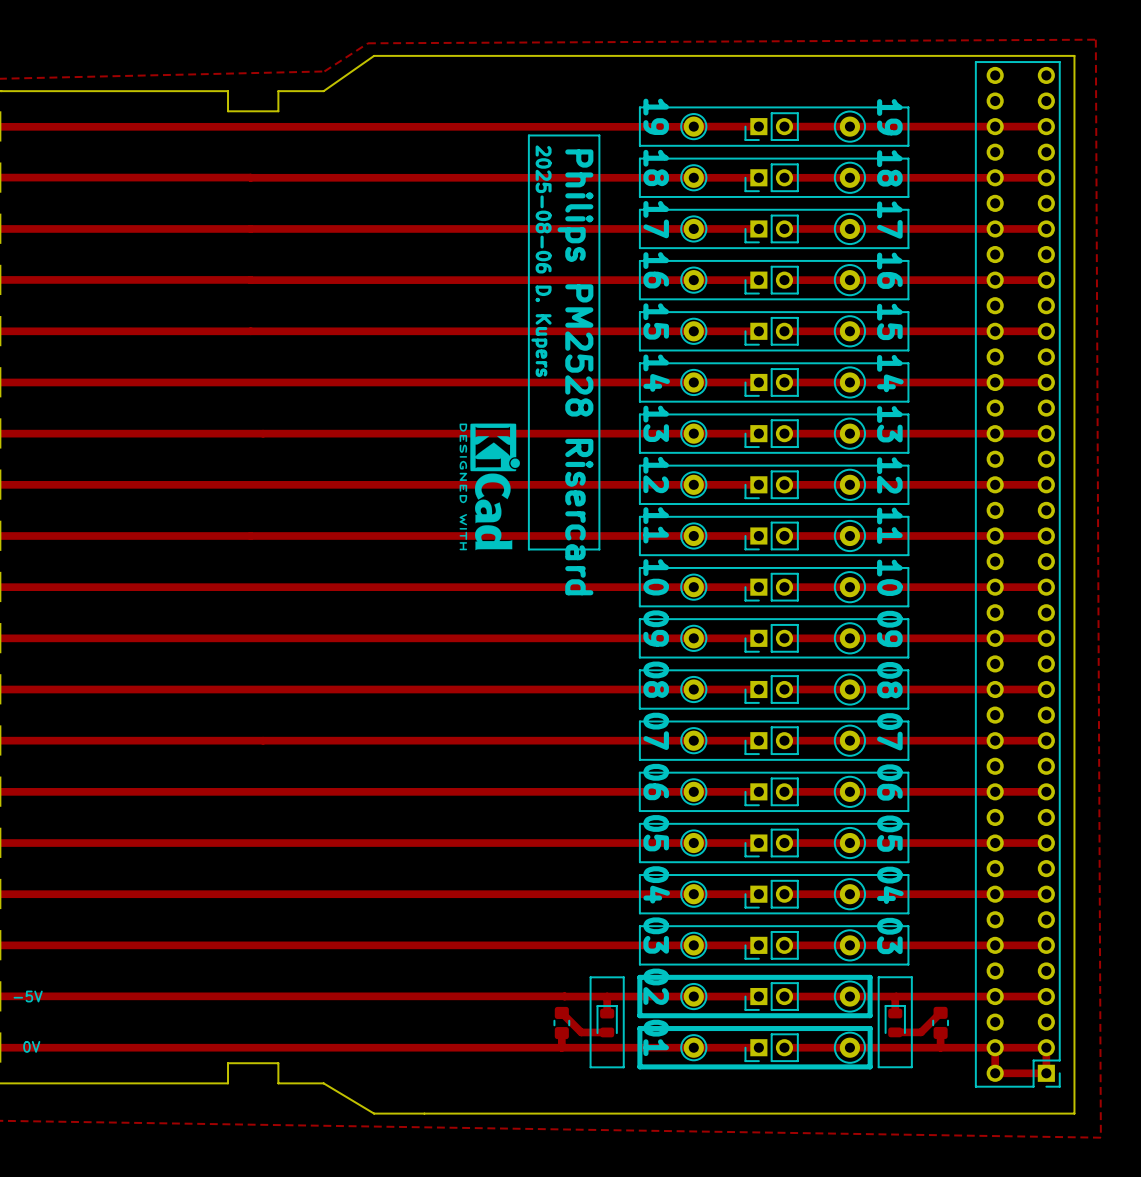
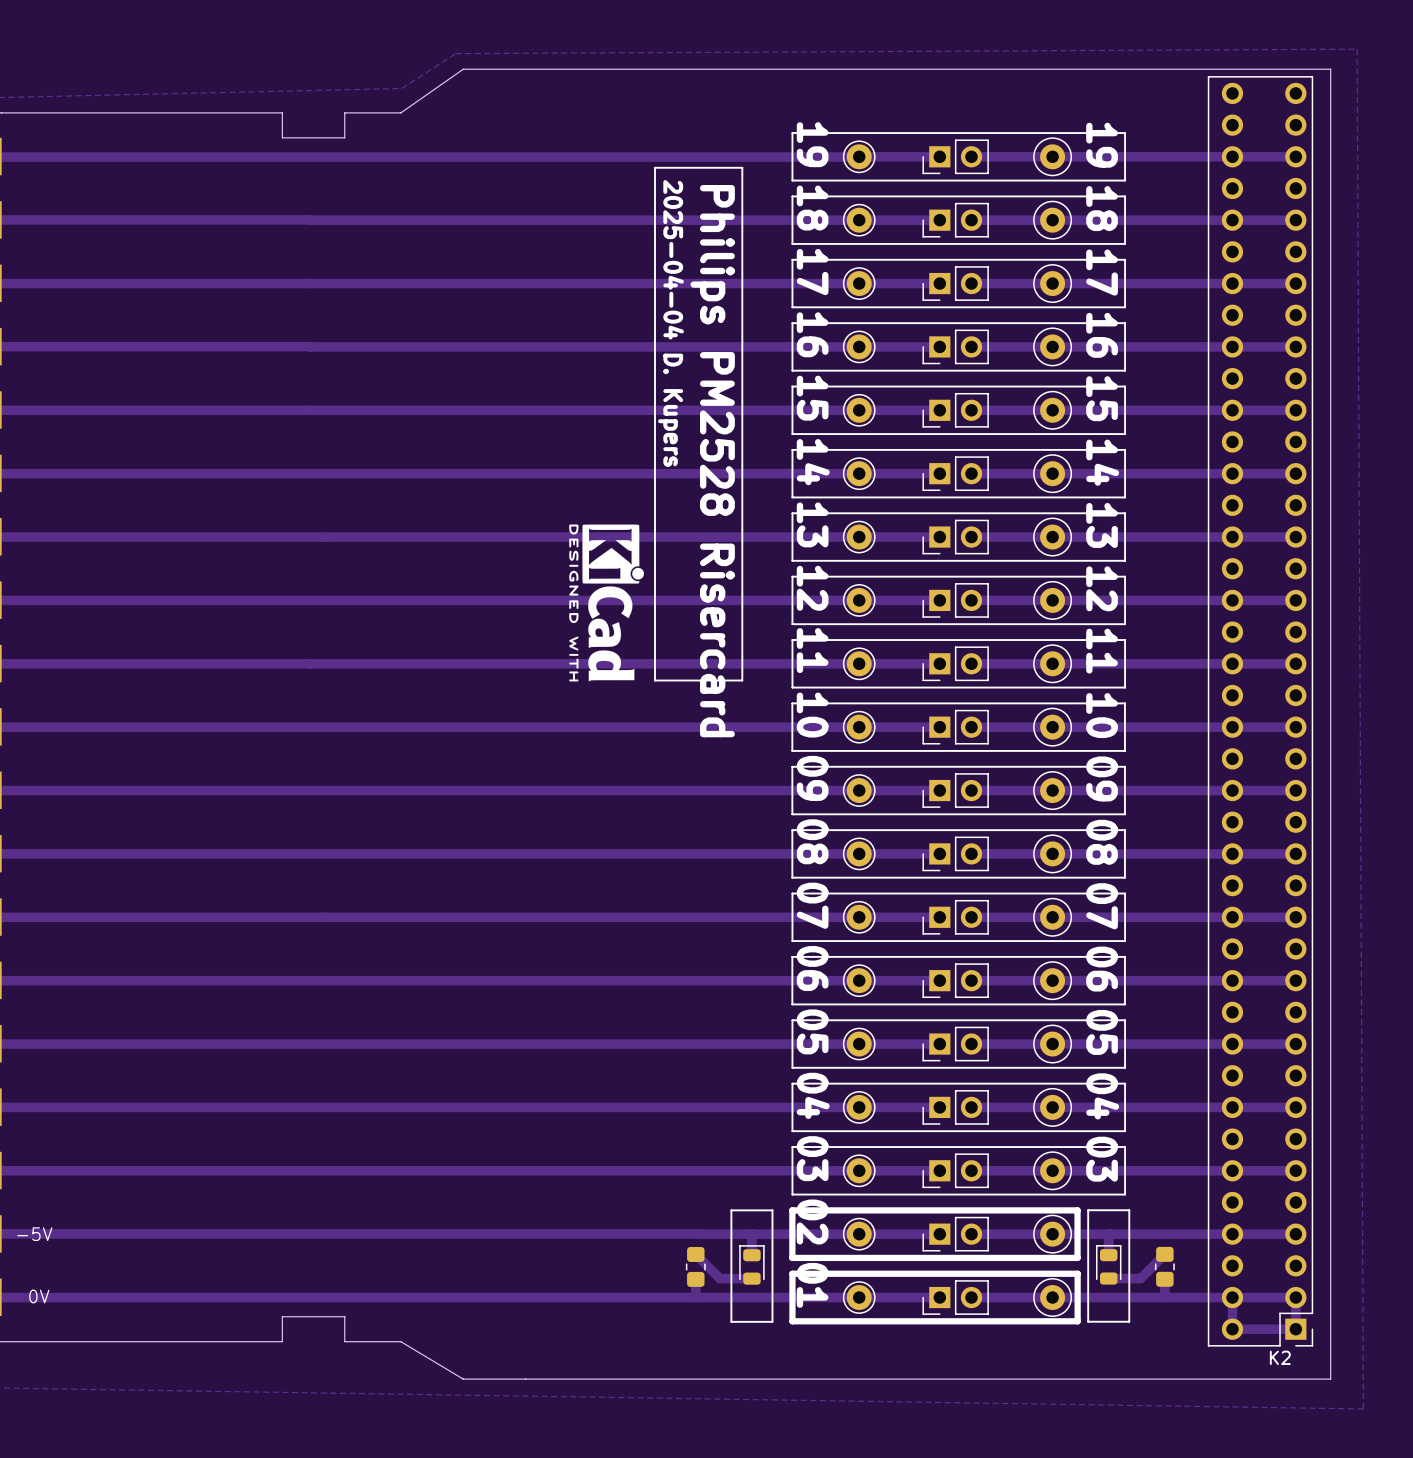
text: 2025-08-06 D. Kupers (541, 261) -> 2025-04-04 D. Kupers (670, 323)
K2 name: none -> K2 (1280, 1357)

